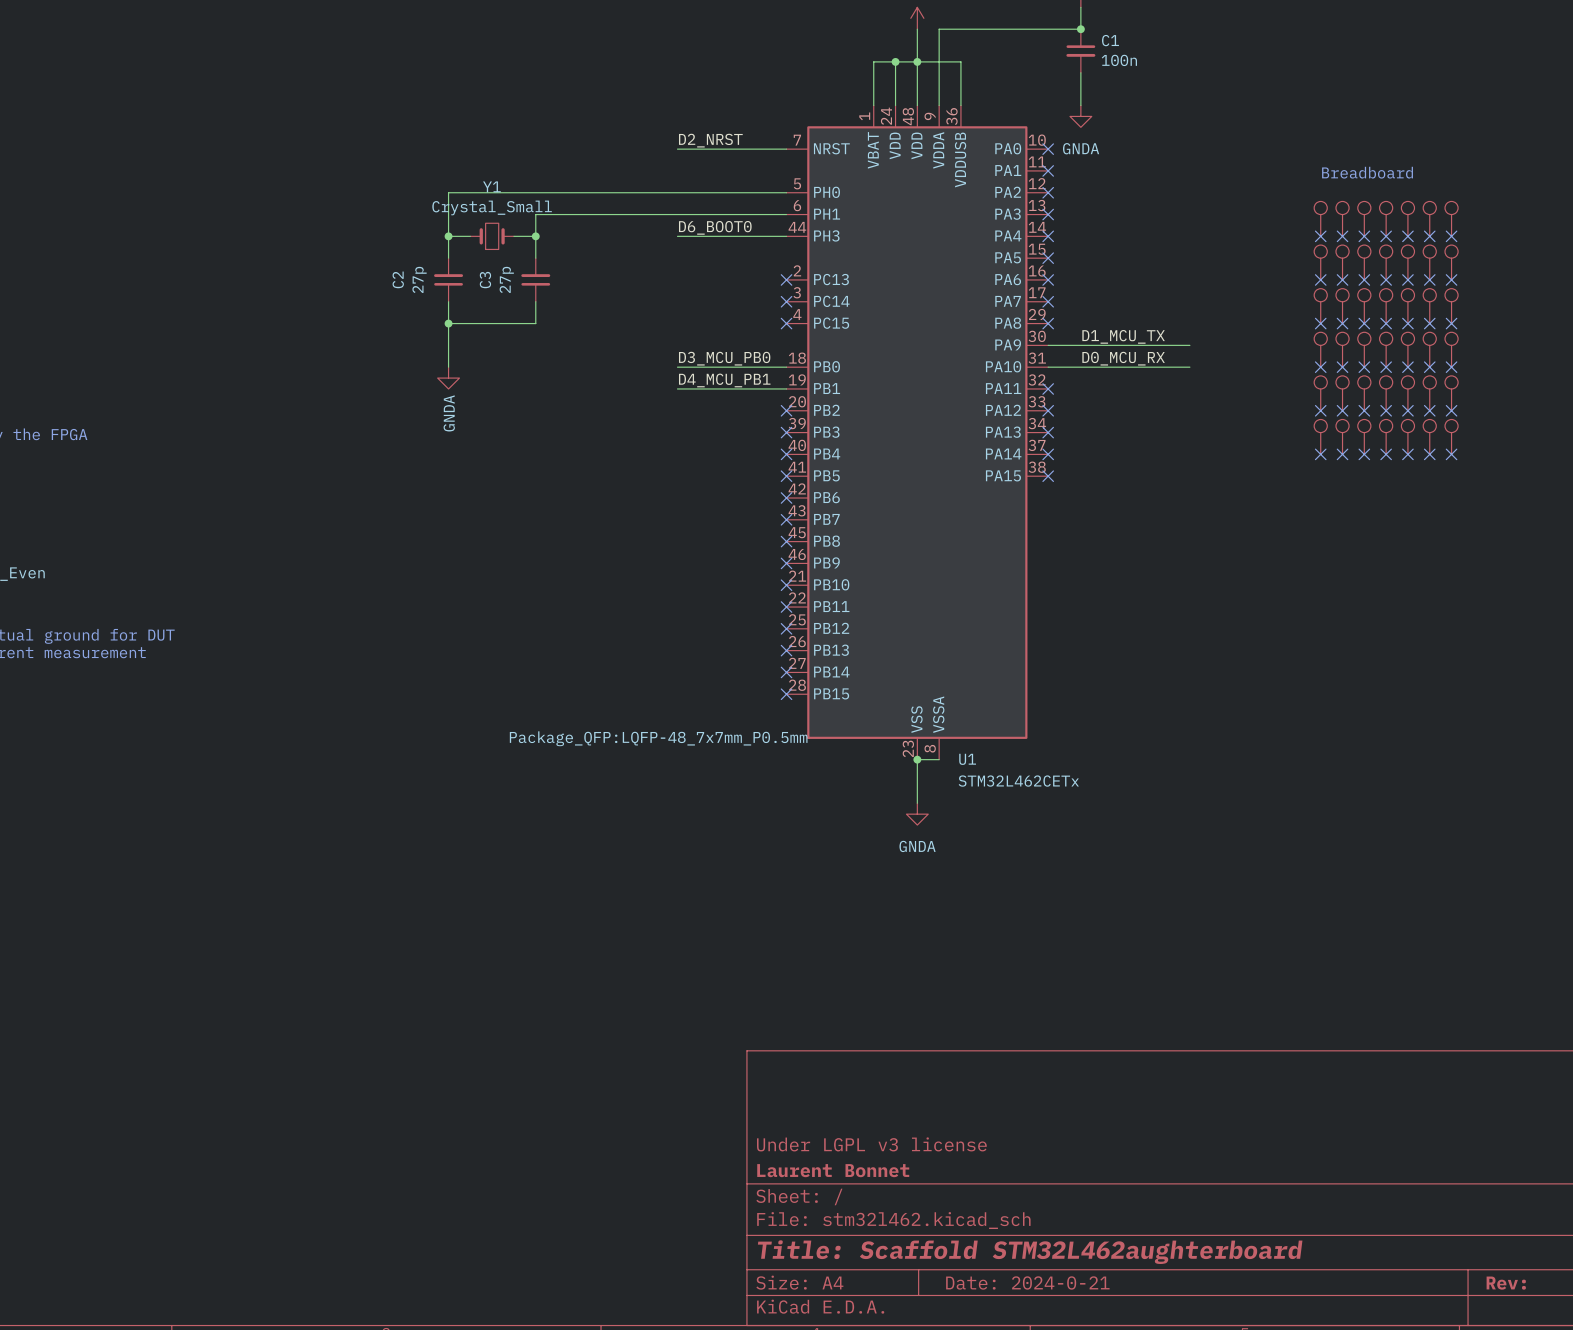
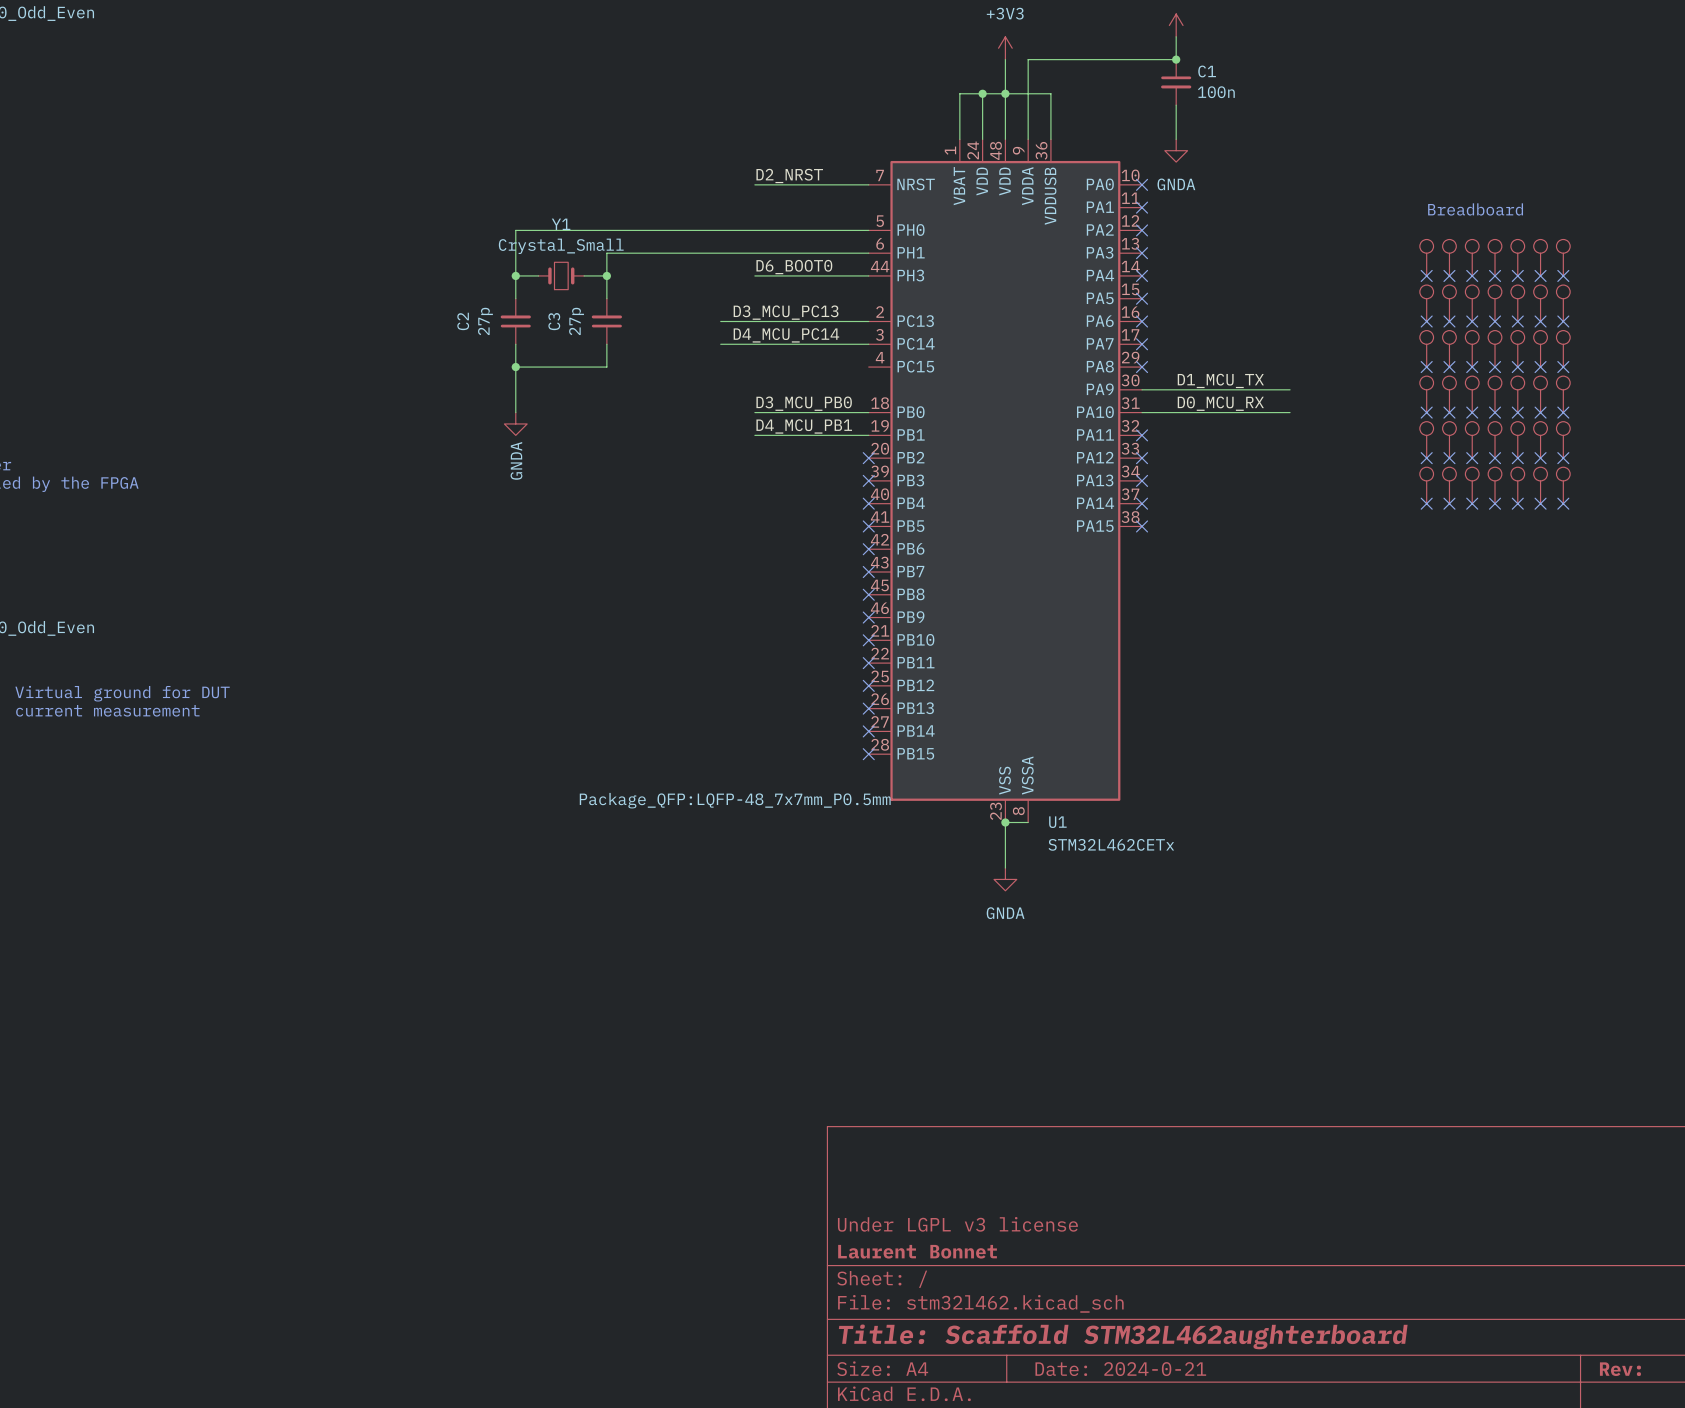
label: none -> D3_MCU_PC13 (786, 312)
wire: none -> (720, 321) (868, 321)
no-connect mark: (786, 279) -> none
label: none -> D4_MCU_PC14 (786, 335)
wire: none -> (720, 344) (868, 344)
no-connect mark: (786, 301) -> none
no-connect mark: (786, 323) -> none

